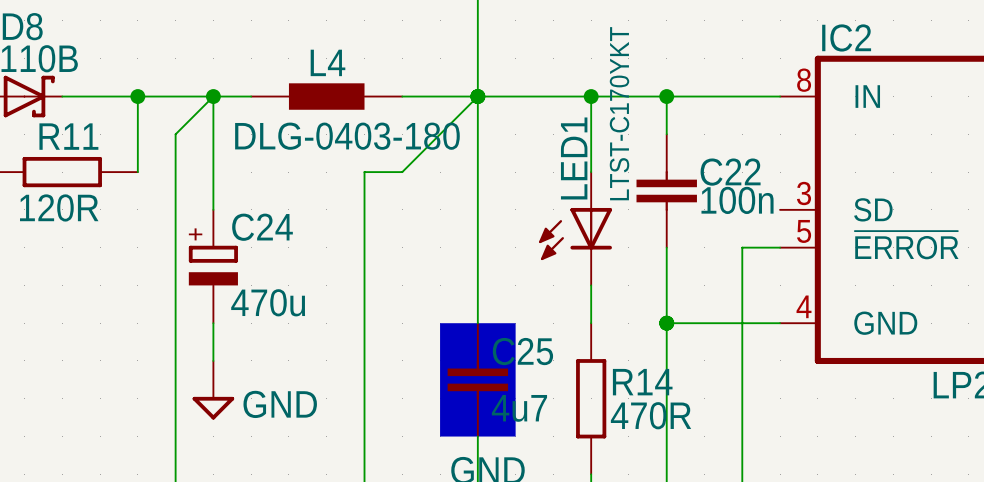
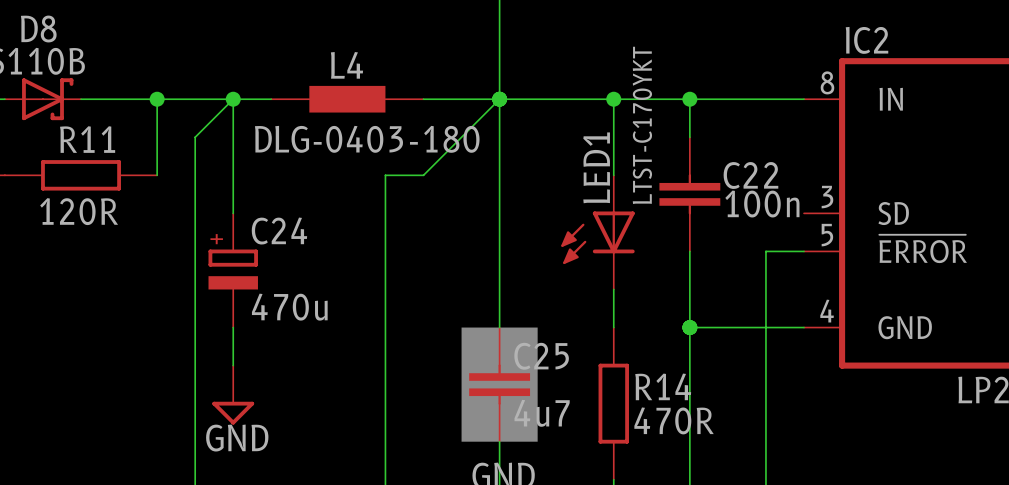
power symbol text position: GND (280, 404) -> GND (237, 438)

